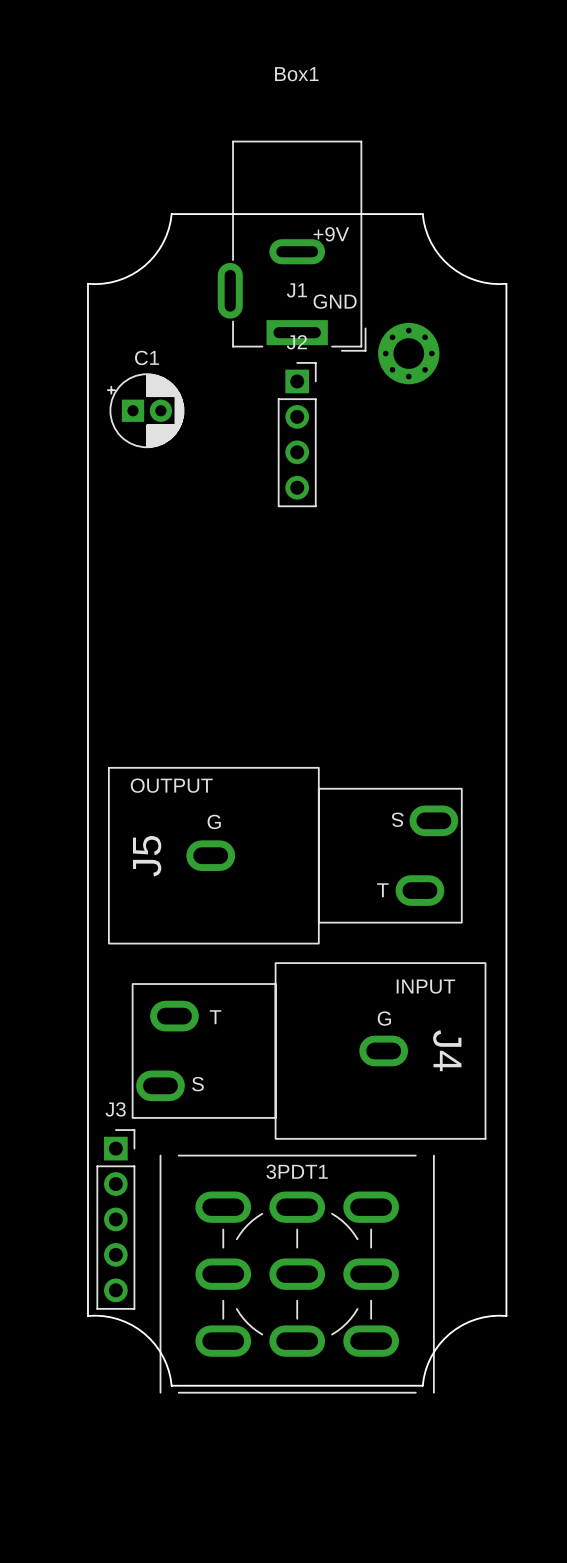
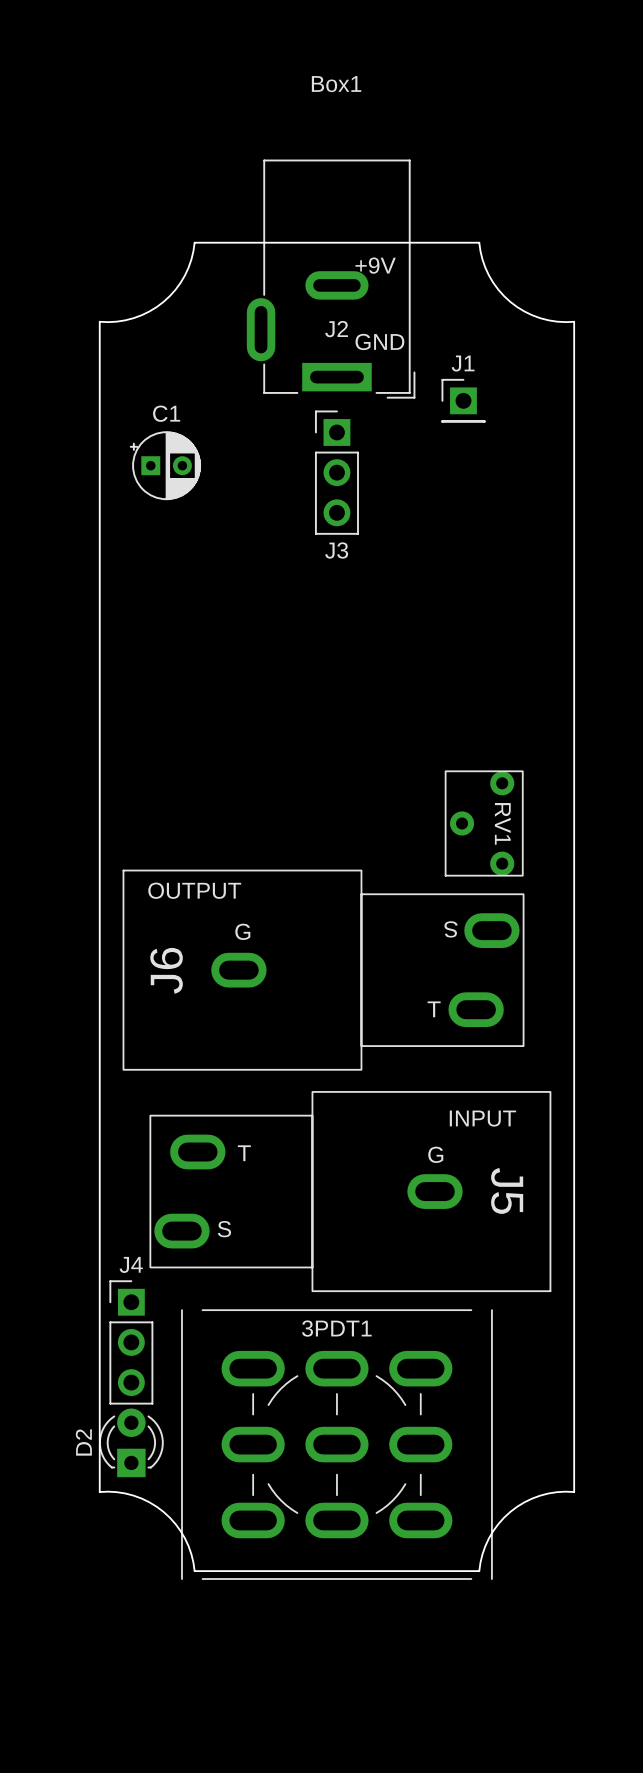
J1 name: J1 (296, 290) -> J2 (336, 329)
part: (408, 353) -> none
J1: none -> (463, 400)
C1 footprint: [106, 373, 185, 449] -> [129, 431, 202, 501]
J2: (297, 434) -> none
RV1: none -> (484, 823)
J5 name: J5 (147, 856) -> J6 (166, 970)
J4 name: J4 (447, 1050) -> J5 (507, 1190)
J3 name position: J3 (115, 1109) -> J3 (336, 550)
J3 footprint: [96, 1129, 136, 1310] -> [314, 410, 359, 535]
J4: none -> (131, 1342)
D2: none -> (131, 1442)

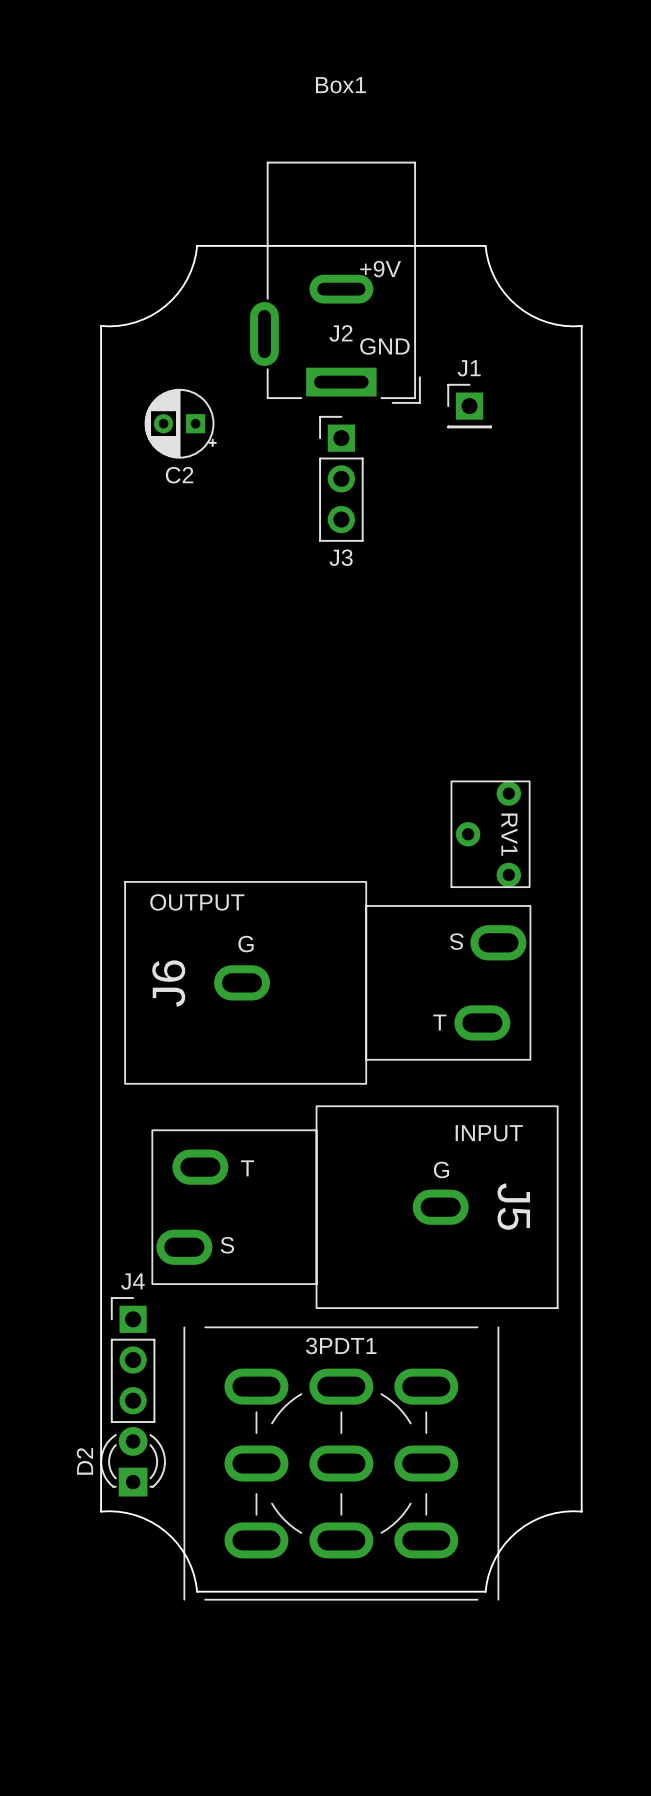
C2: none -> (180, 423)
C1: (165, 465) -> none

